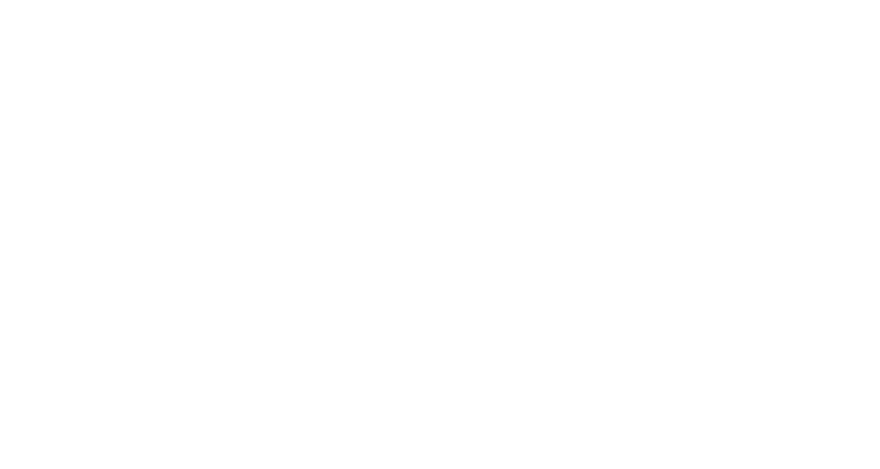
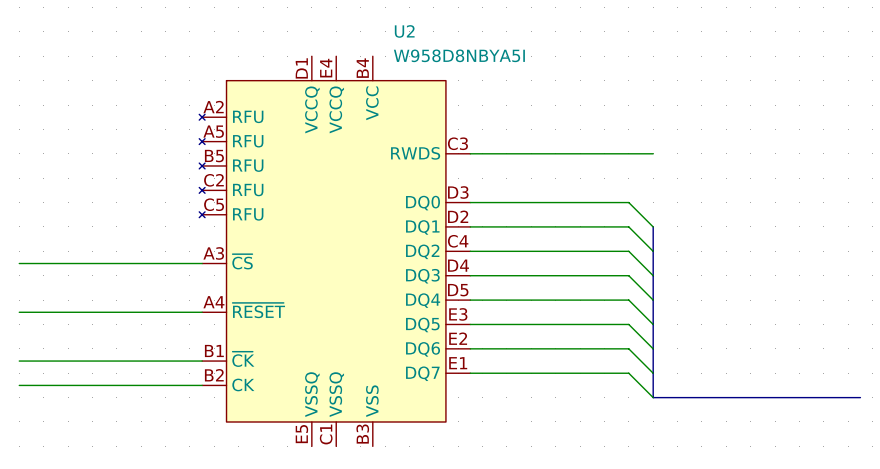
wire: none -> (470, 153) (653, 153)
wire: none -> (470, 202) (628, 202) (653, 226)
wire: none -> (470, 226) (628, 226) (653, 251)
bus: none -> (653, 226) (653, 397) (860, 397)
U2: none -> W958D8NBYA5I (334, 251)
wire: none -> (470, 251) (628, 251) (653, 275)
wire: none -> (19, 263) (202, 263)
wire: none -> (470, 275) (628, 275) (653, 300)
wire: none -> (470, 300) (628, 300) (653, 324)
wire: none -> (19, 312) (202, 312)
wire: none -> (470, 324) (628, 324) (653, 348)
wire: none -> (470, 348) (628, 348) (653, 373)
wire: none -> (19, 361) (202, 361)
wire: none -> (470, 373) (628, 373) (653, 397)
wire: none -> (19, 385) (202, 385)

